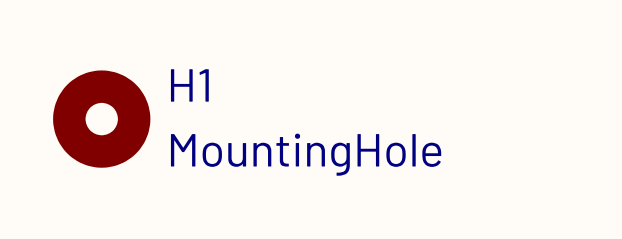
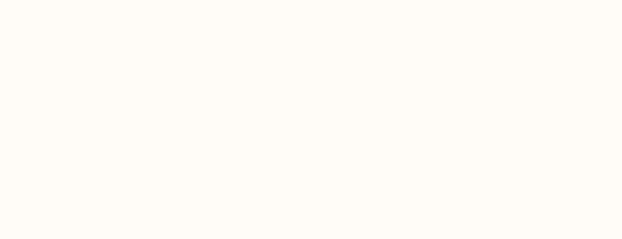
H1: MountingHole (101, 119) -> none

